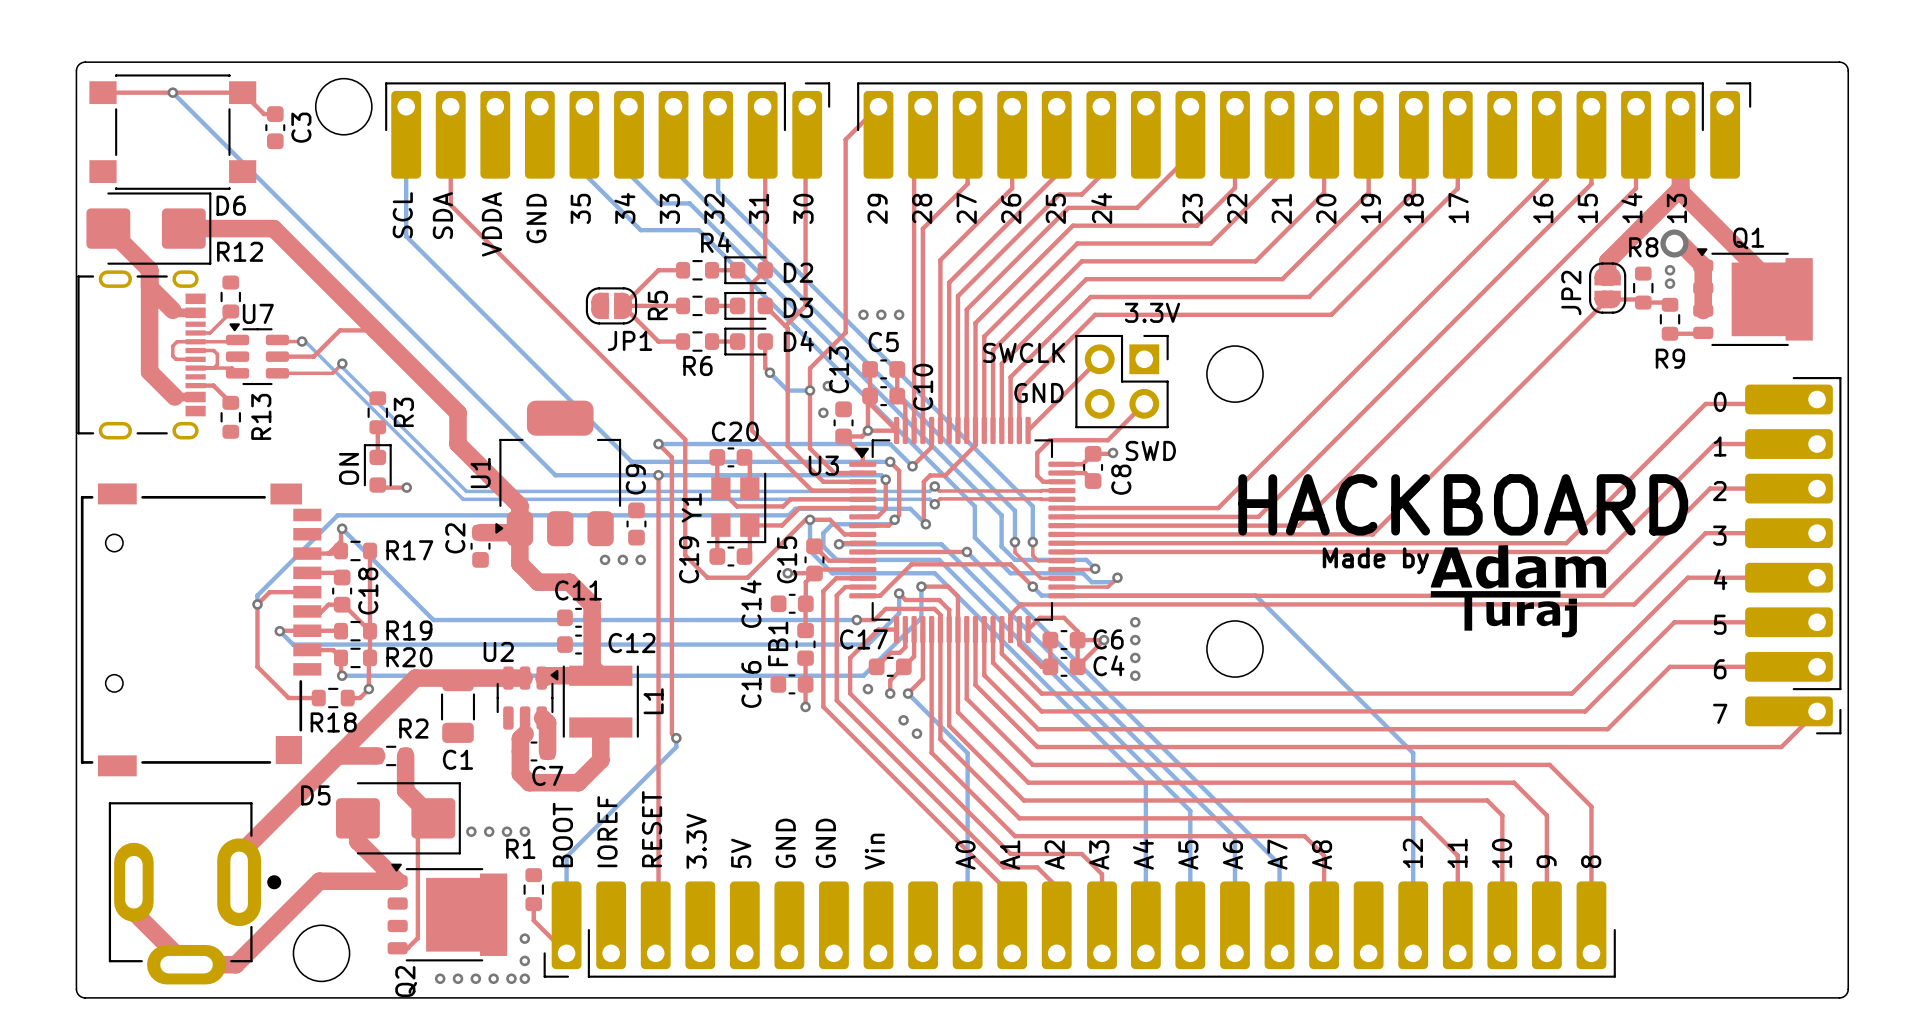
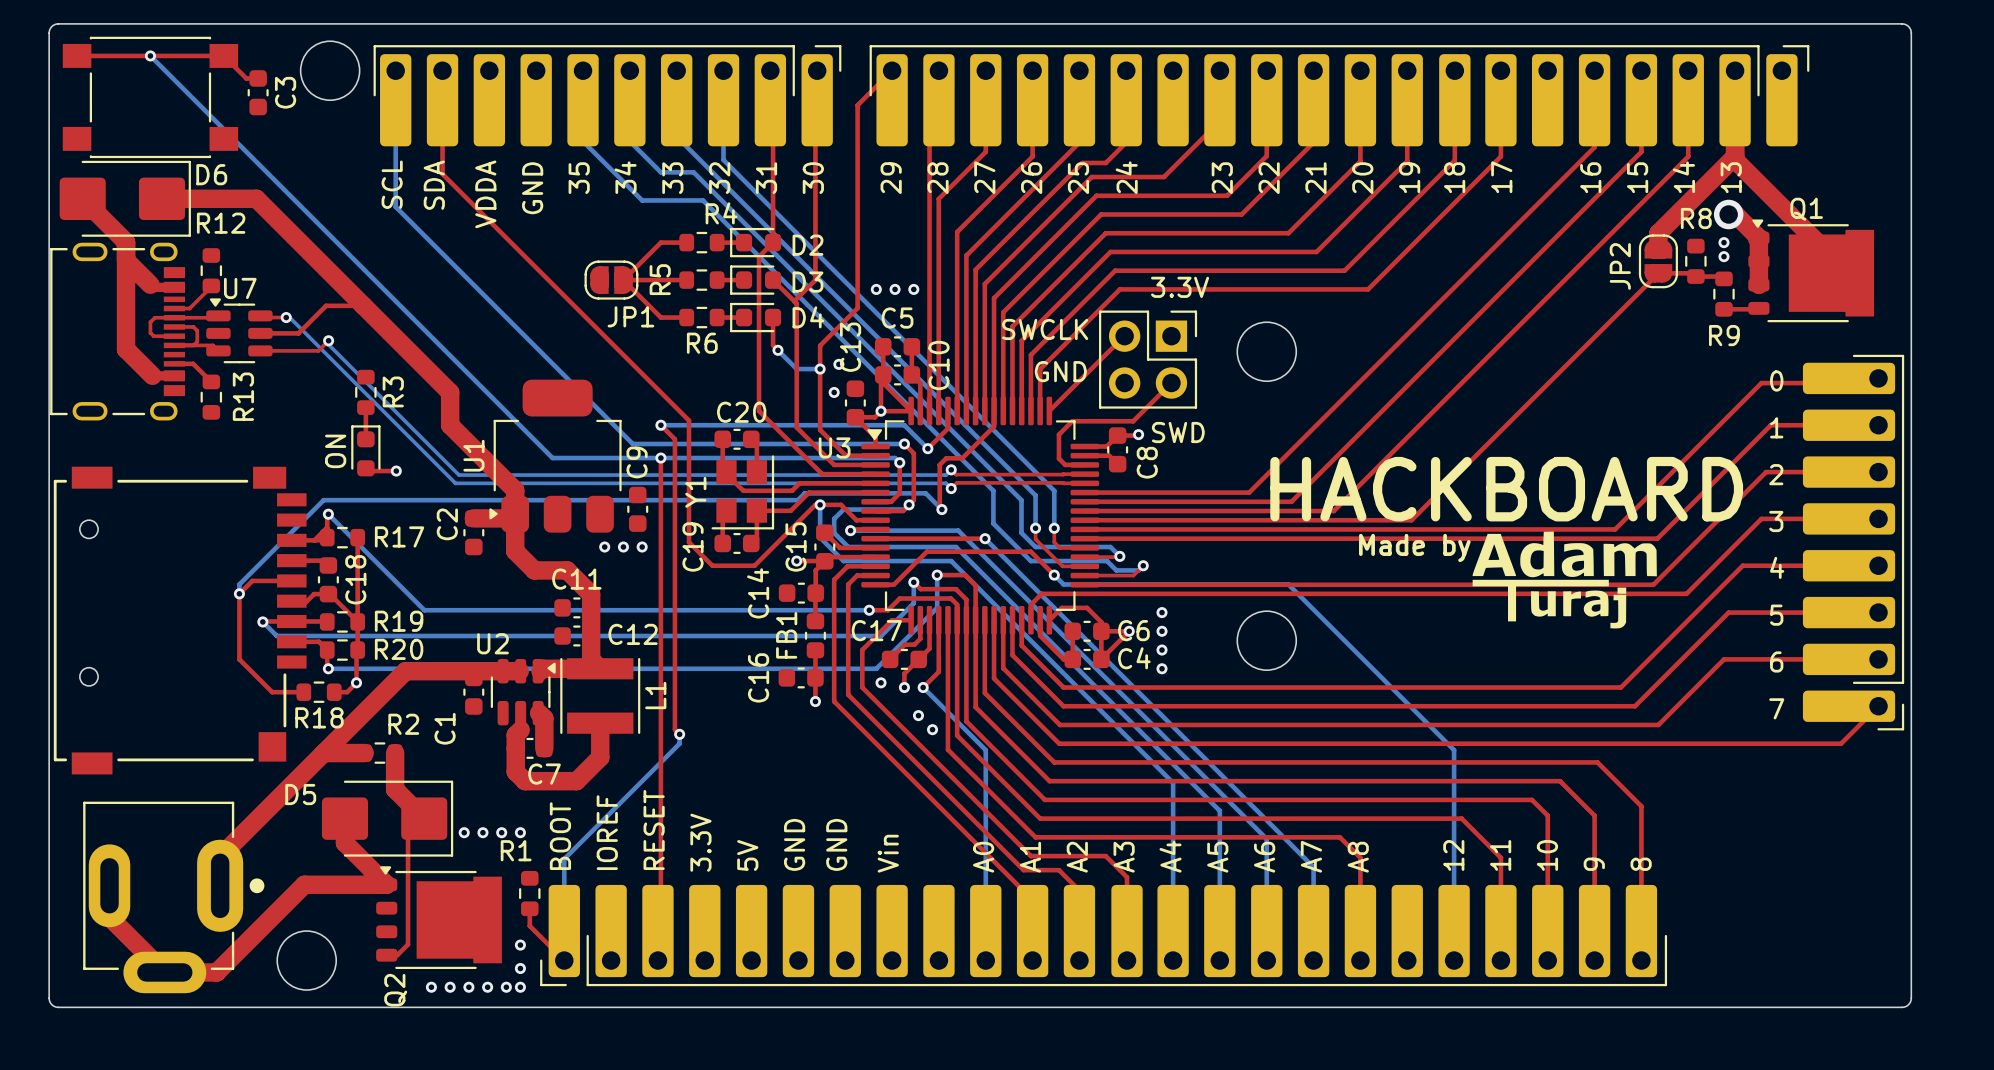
C1 footprint: [440, 670, 476, 743] -> [463, 669, 485, 715]

